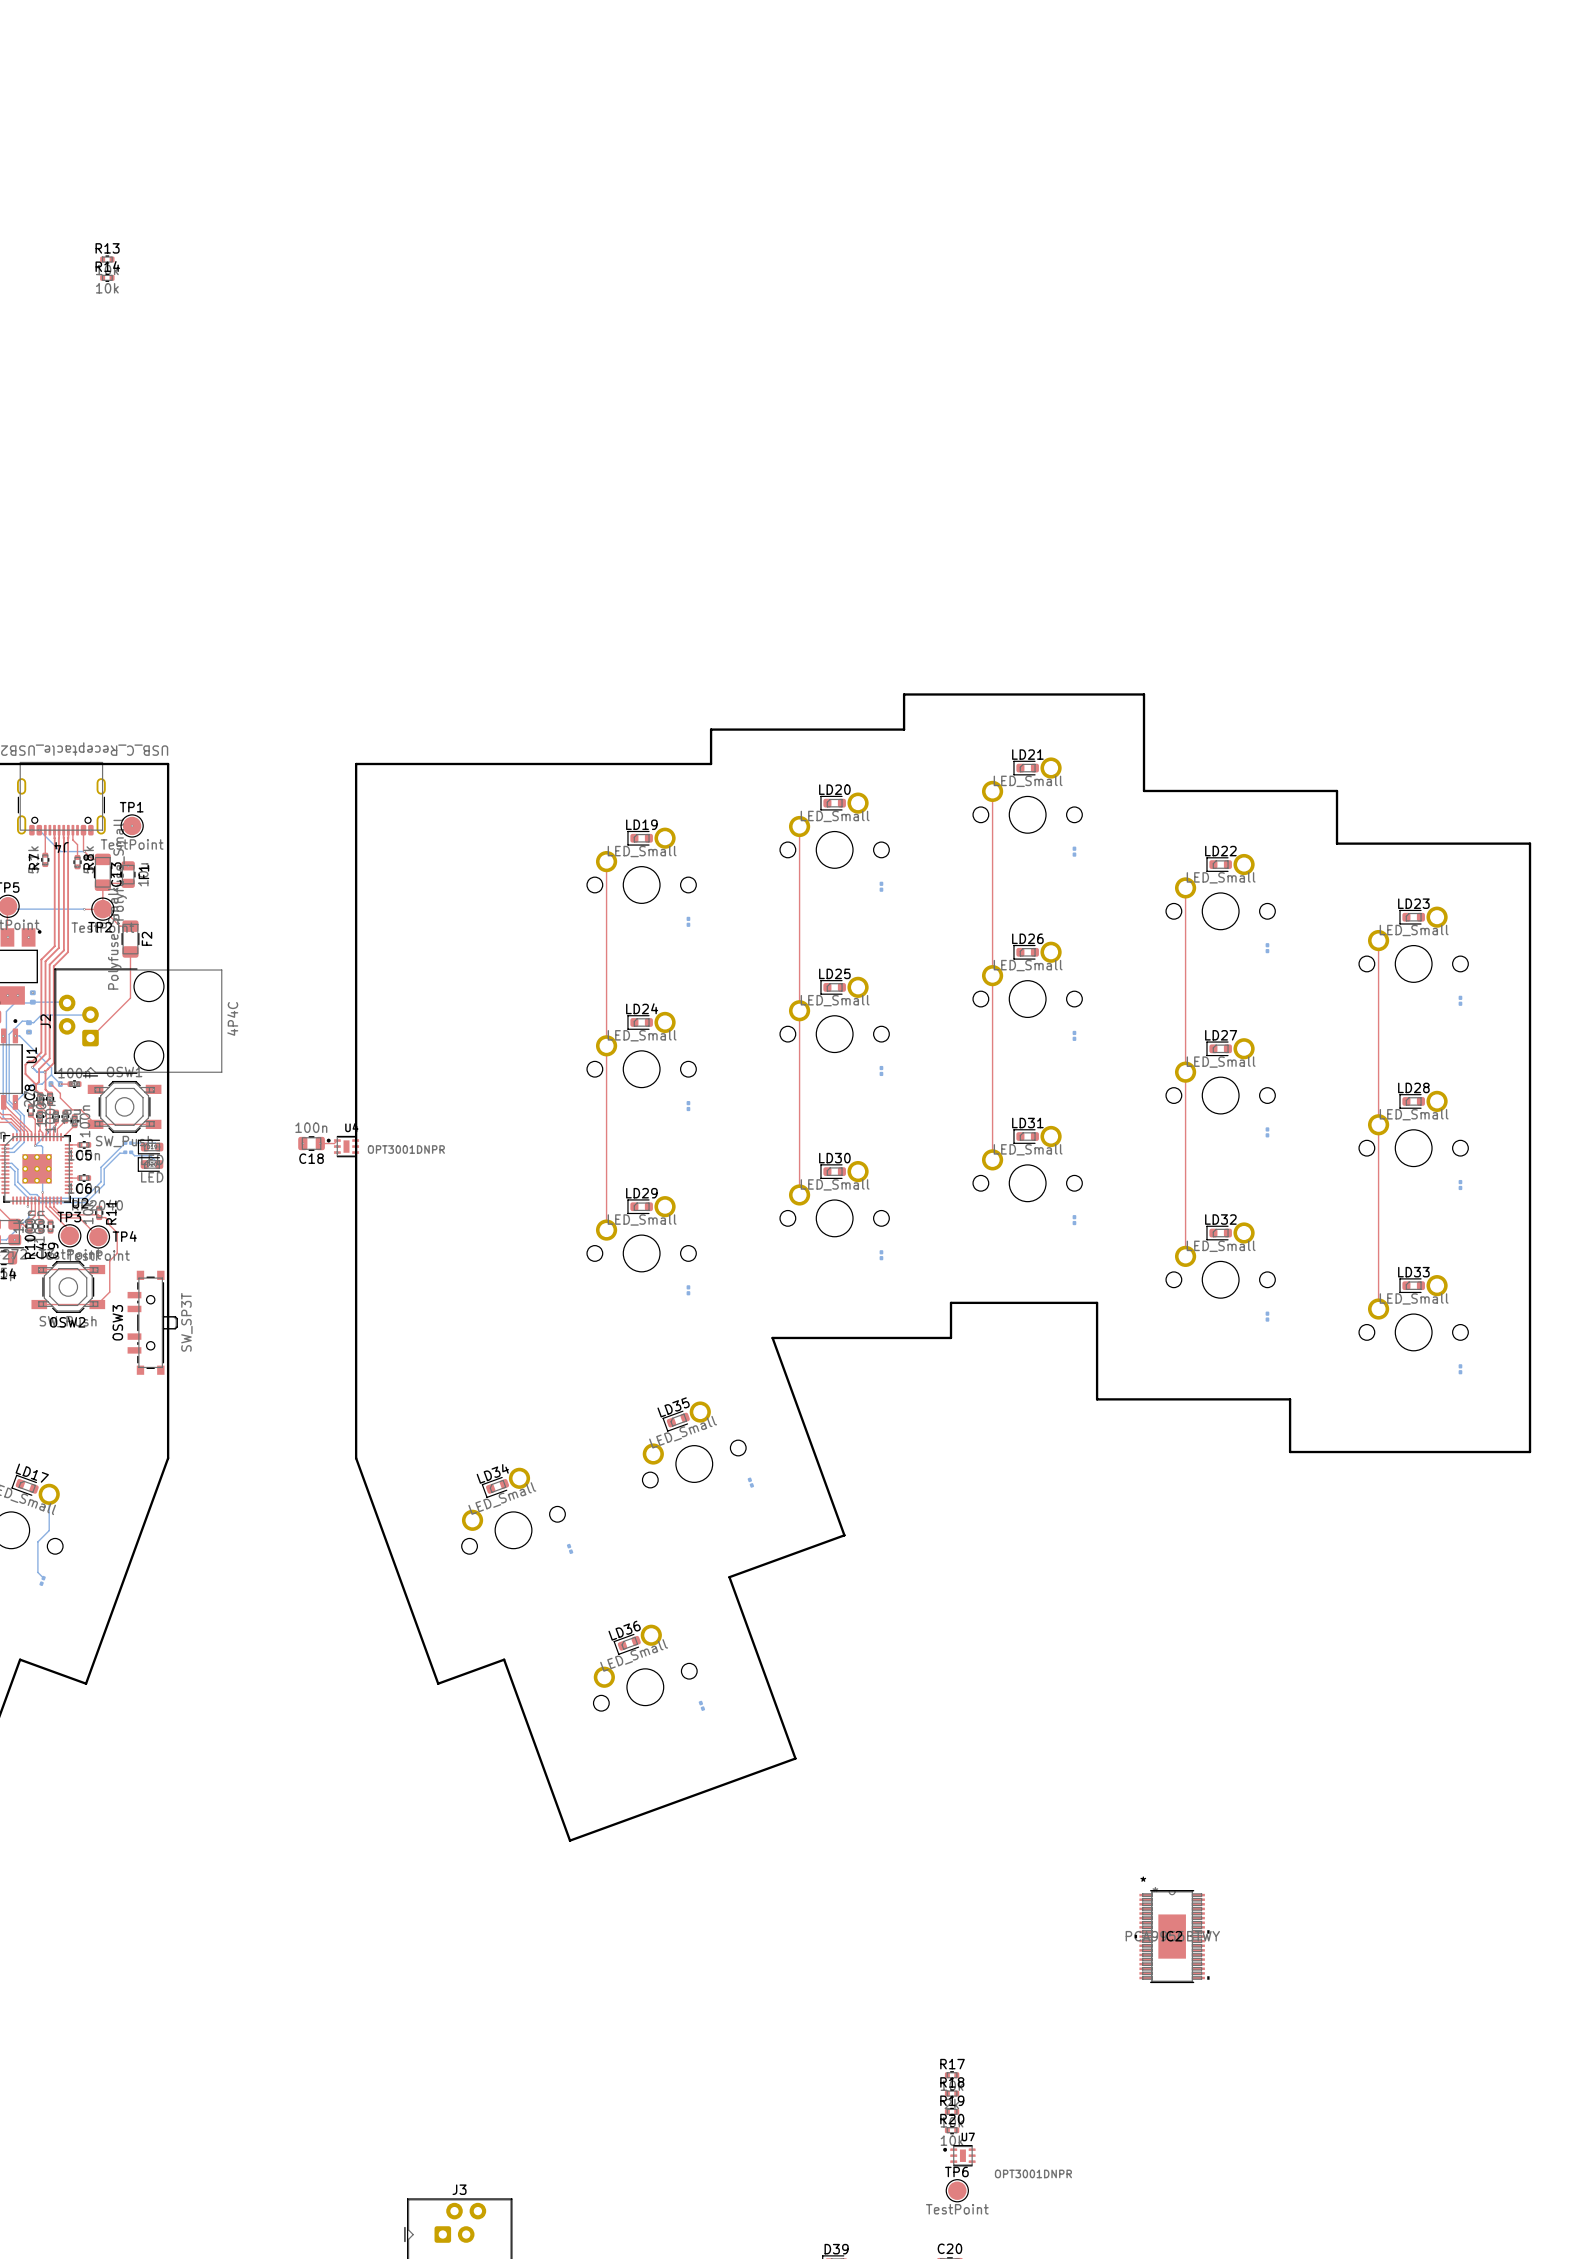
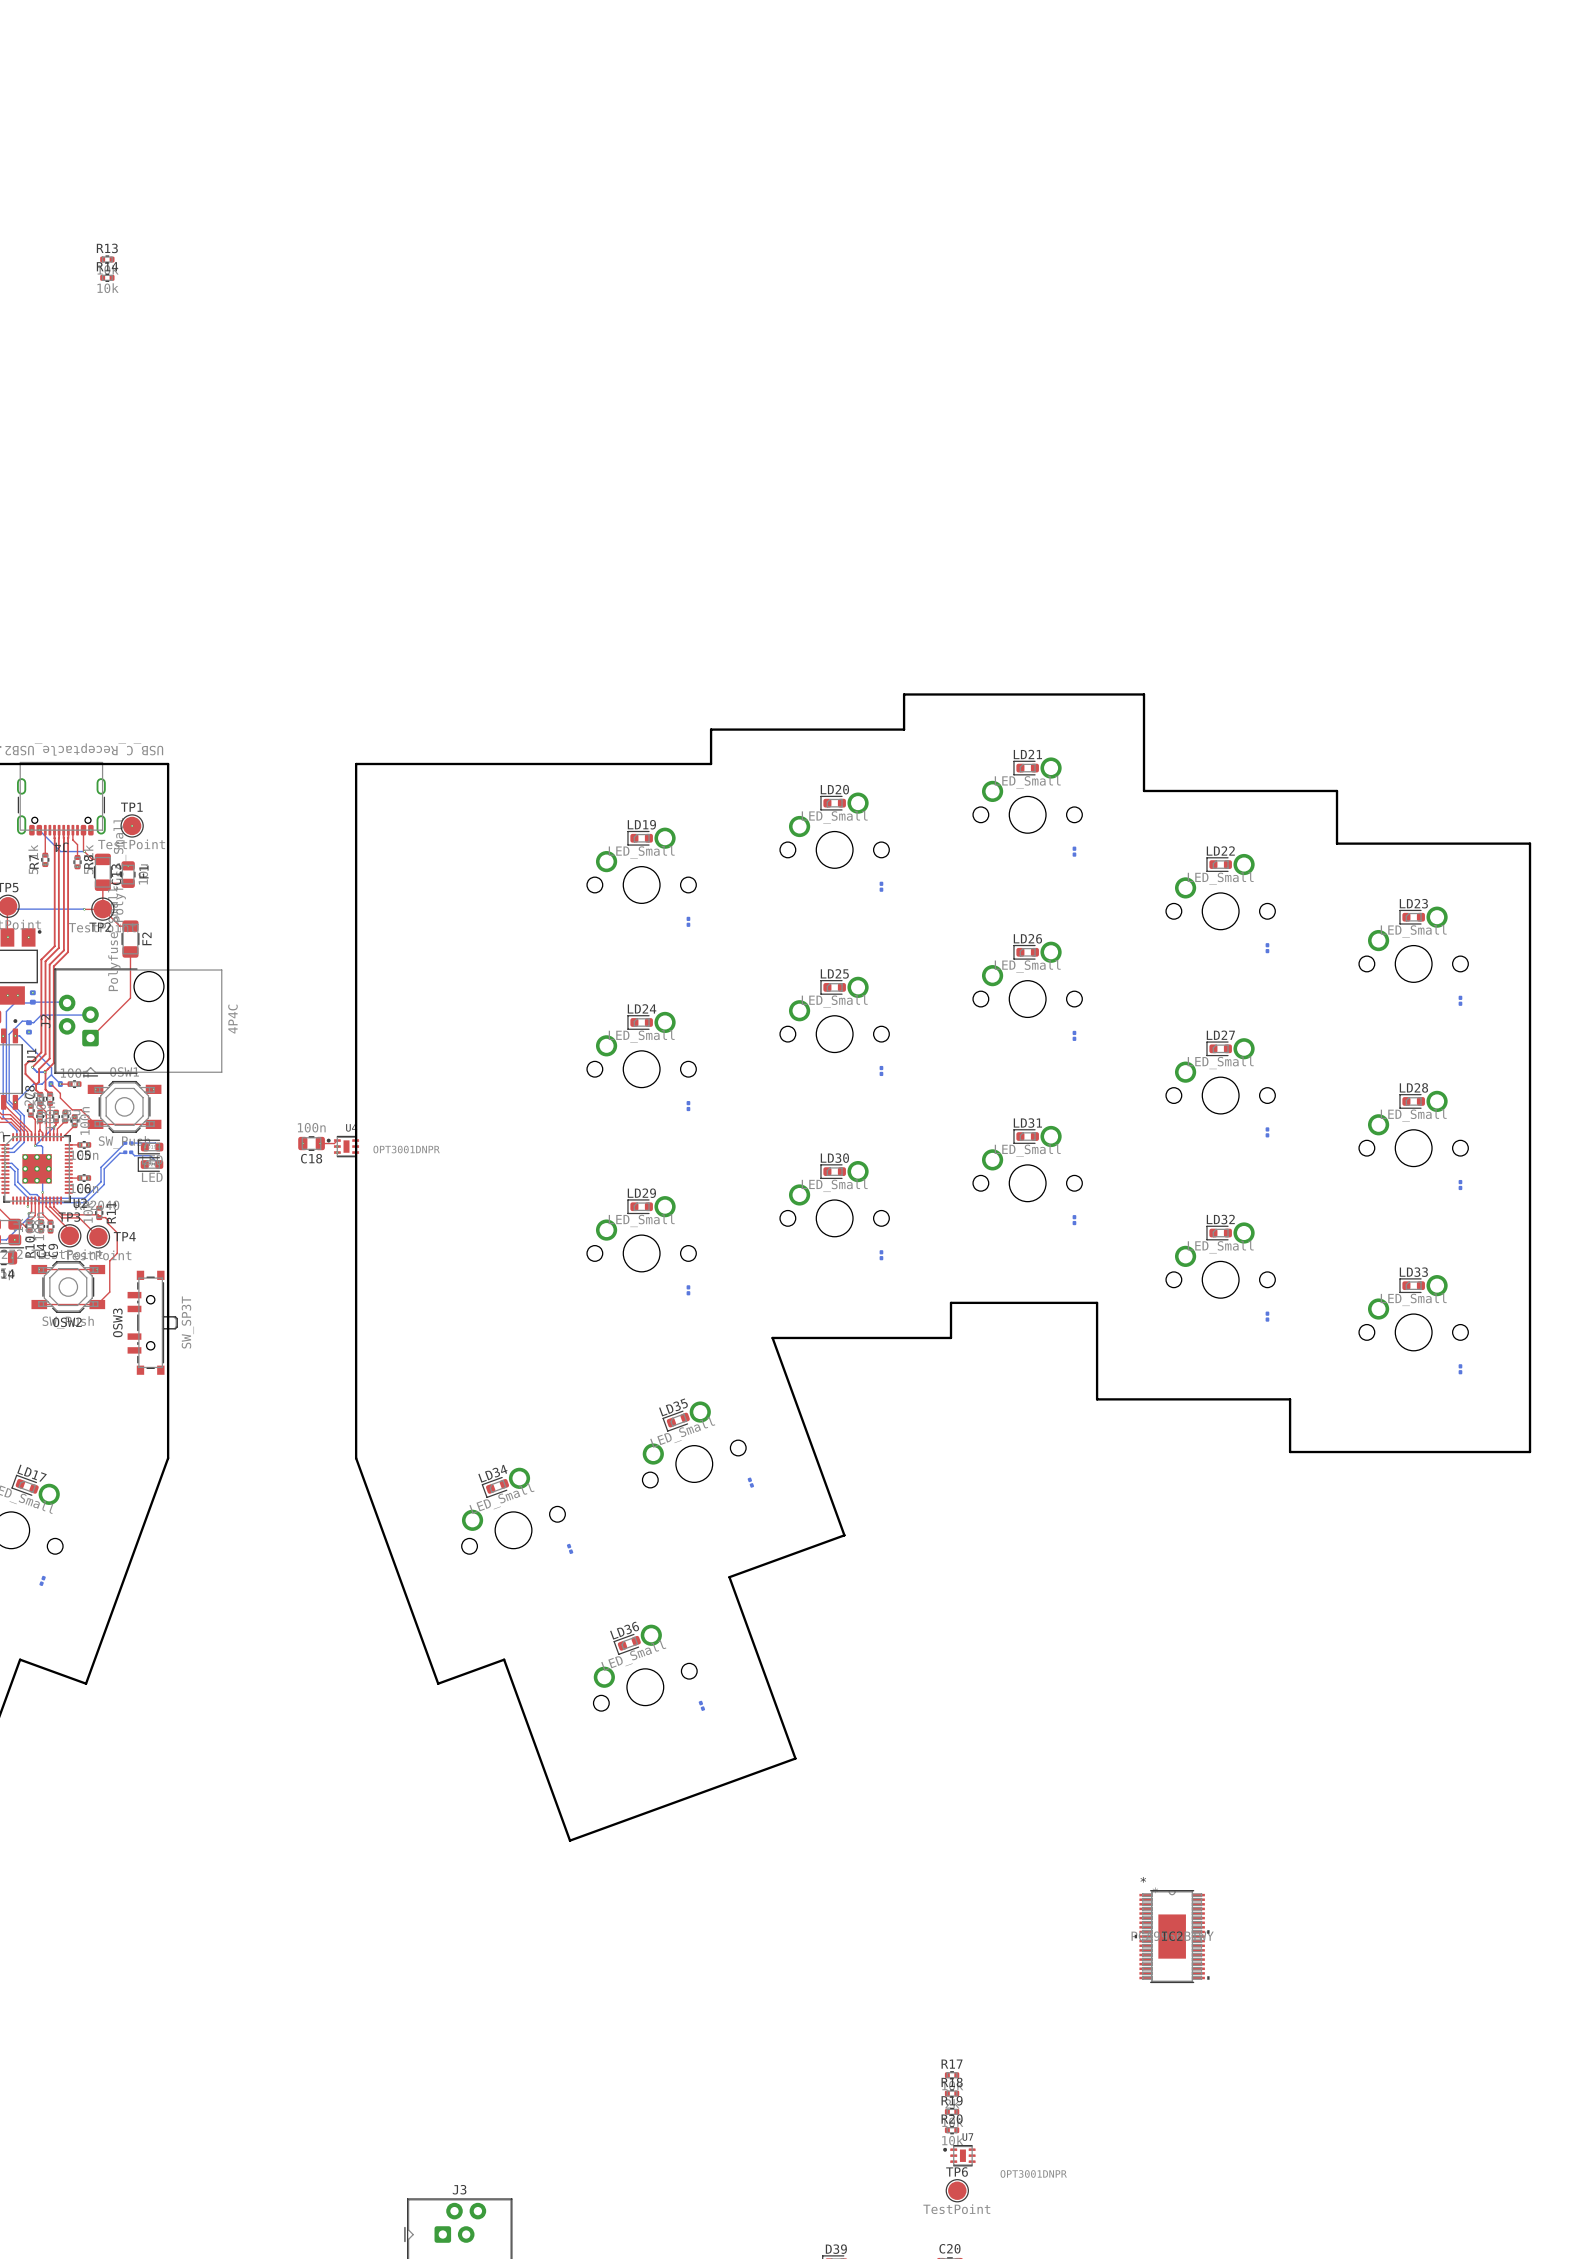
top track: (992, 791) (992, 1159) -> none
top track: (799, 826) (799, 1194) -> none
top track: (606, 861) (606, 1230) -> none
top track: (1185, 887) (1185, 1256) -> none
top track: (1378, 940) (1378, 1309) -> none
bottom track: (49, 1494) (49, 1530) (37, 1541) (37, 1572) (43, 1578) -> none

